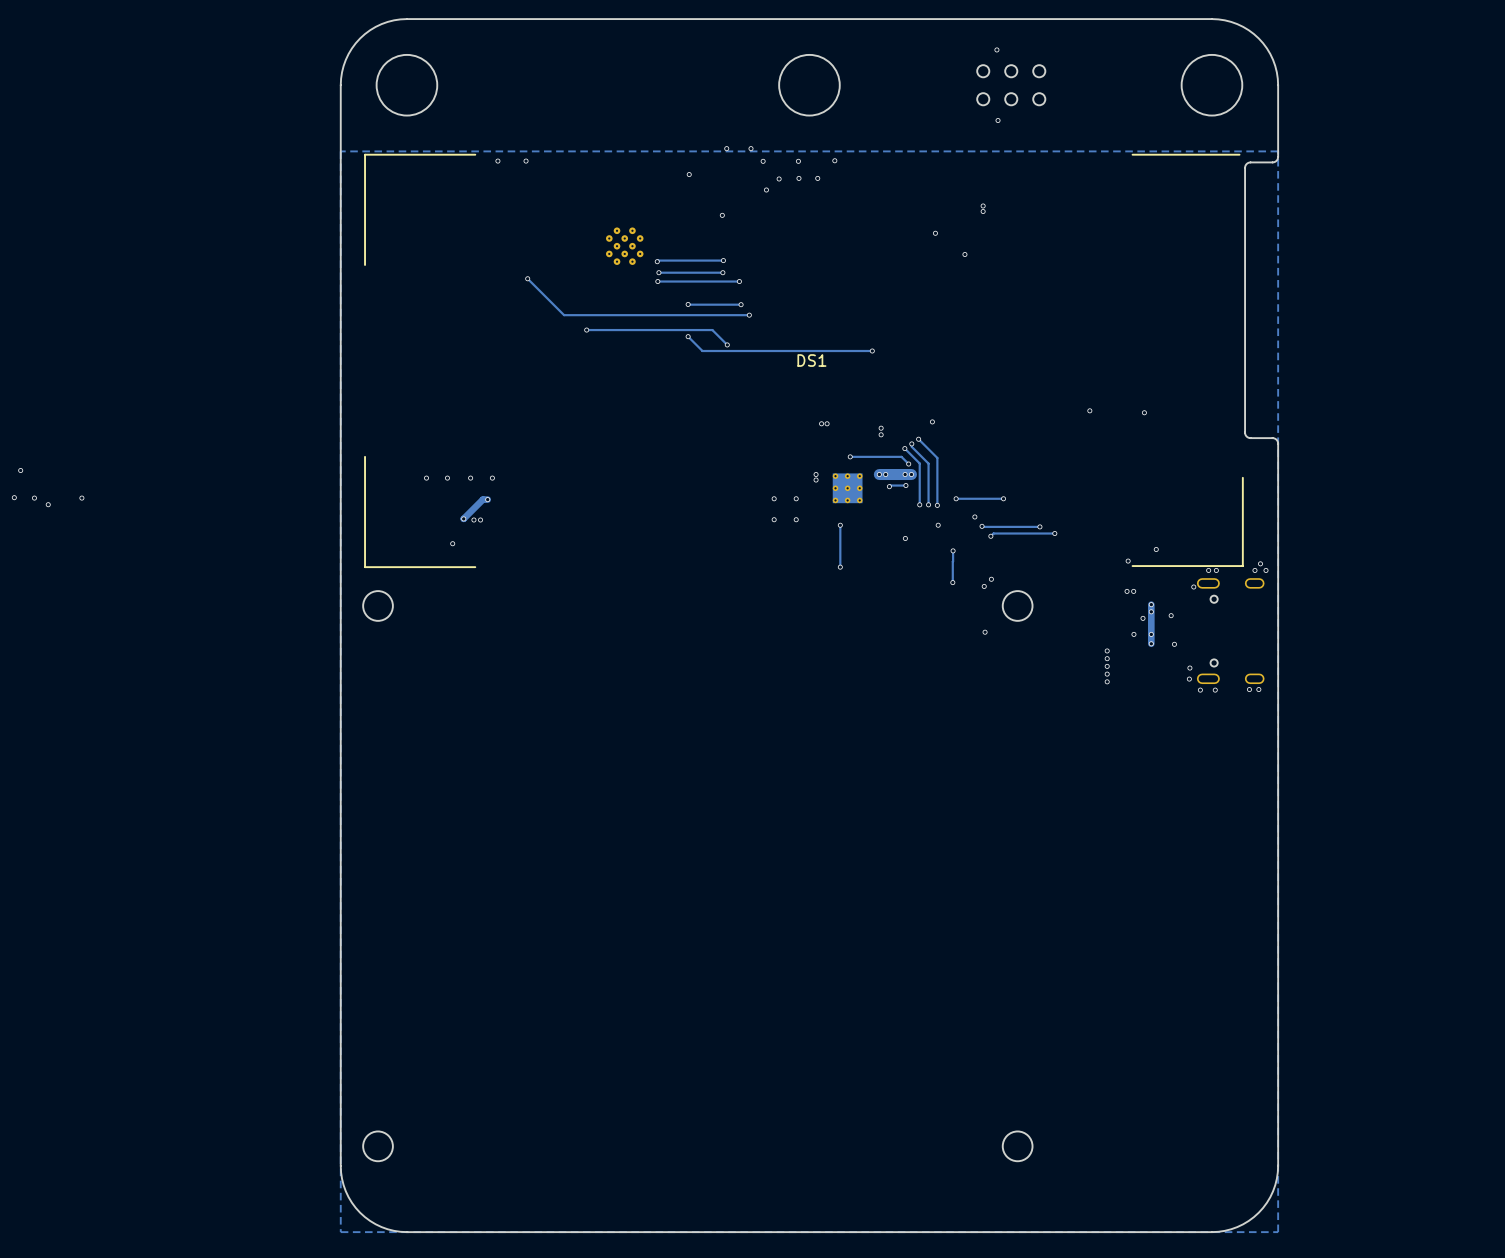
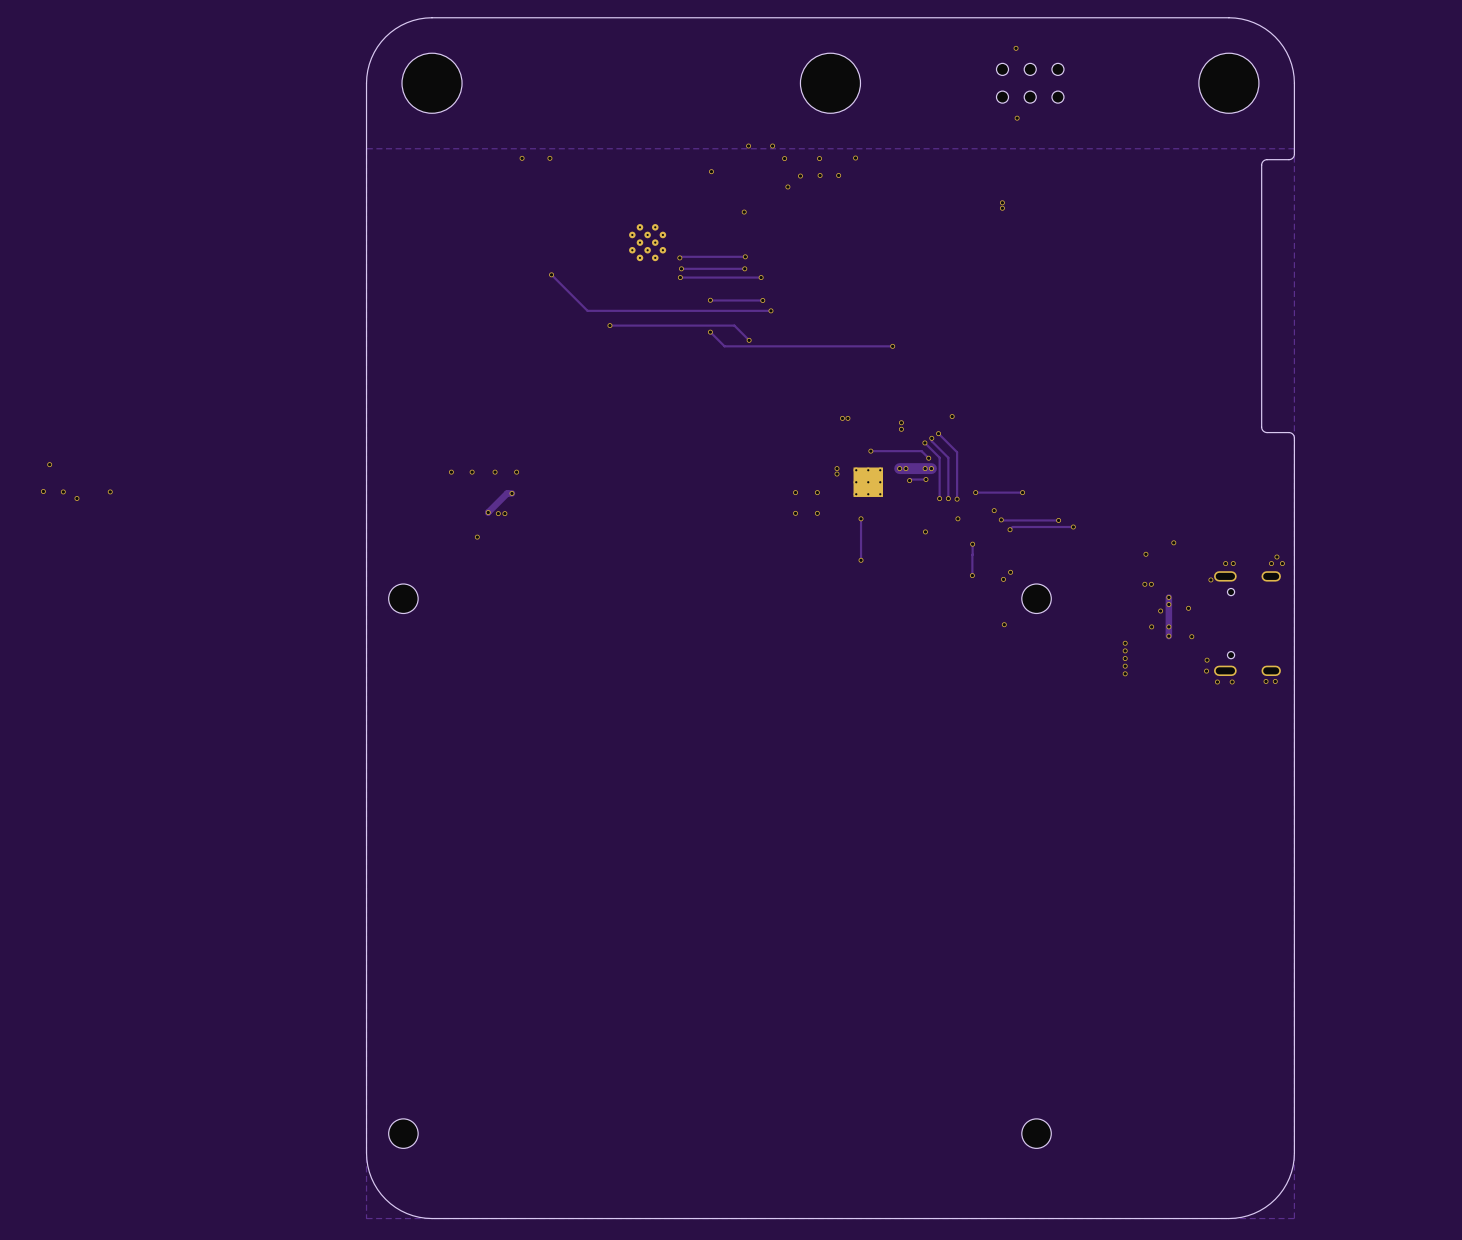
via: (935, 233) -> none
via: (964, 254) -> none
DS1: (803, 360) -> none
via: (1089, 410) -> none
via: (1144, 412) -> none

